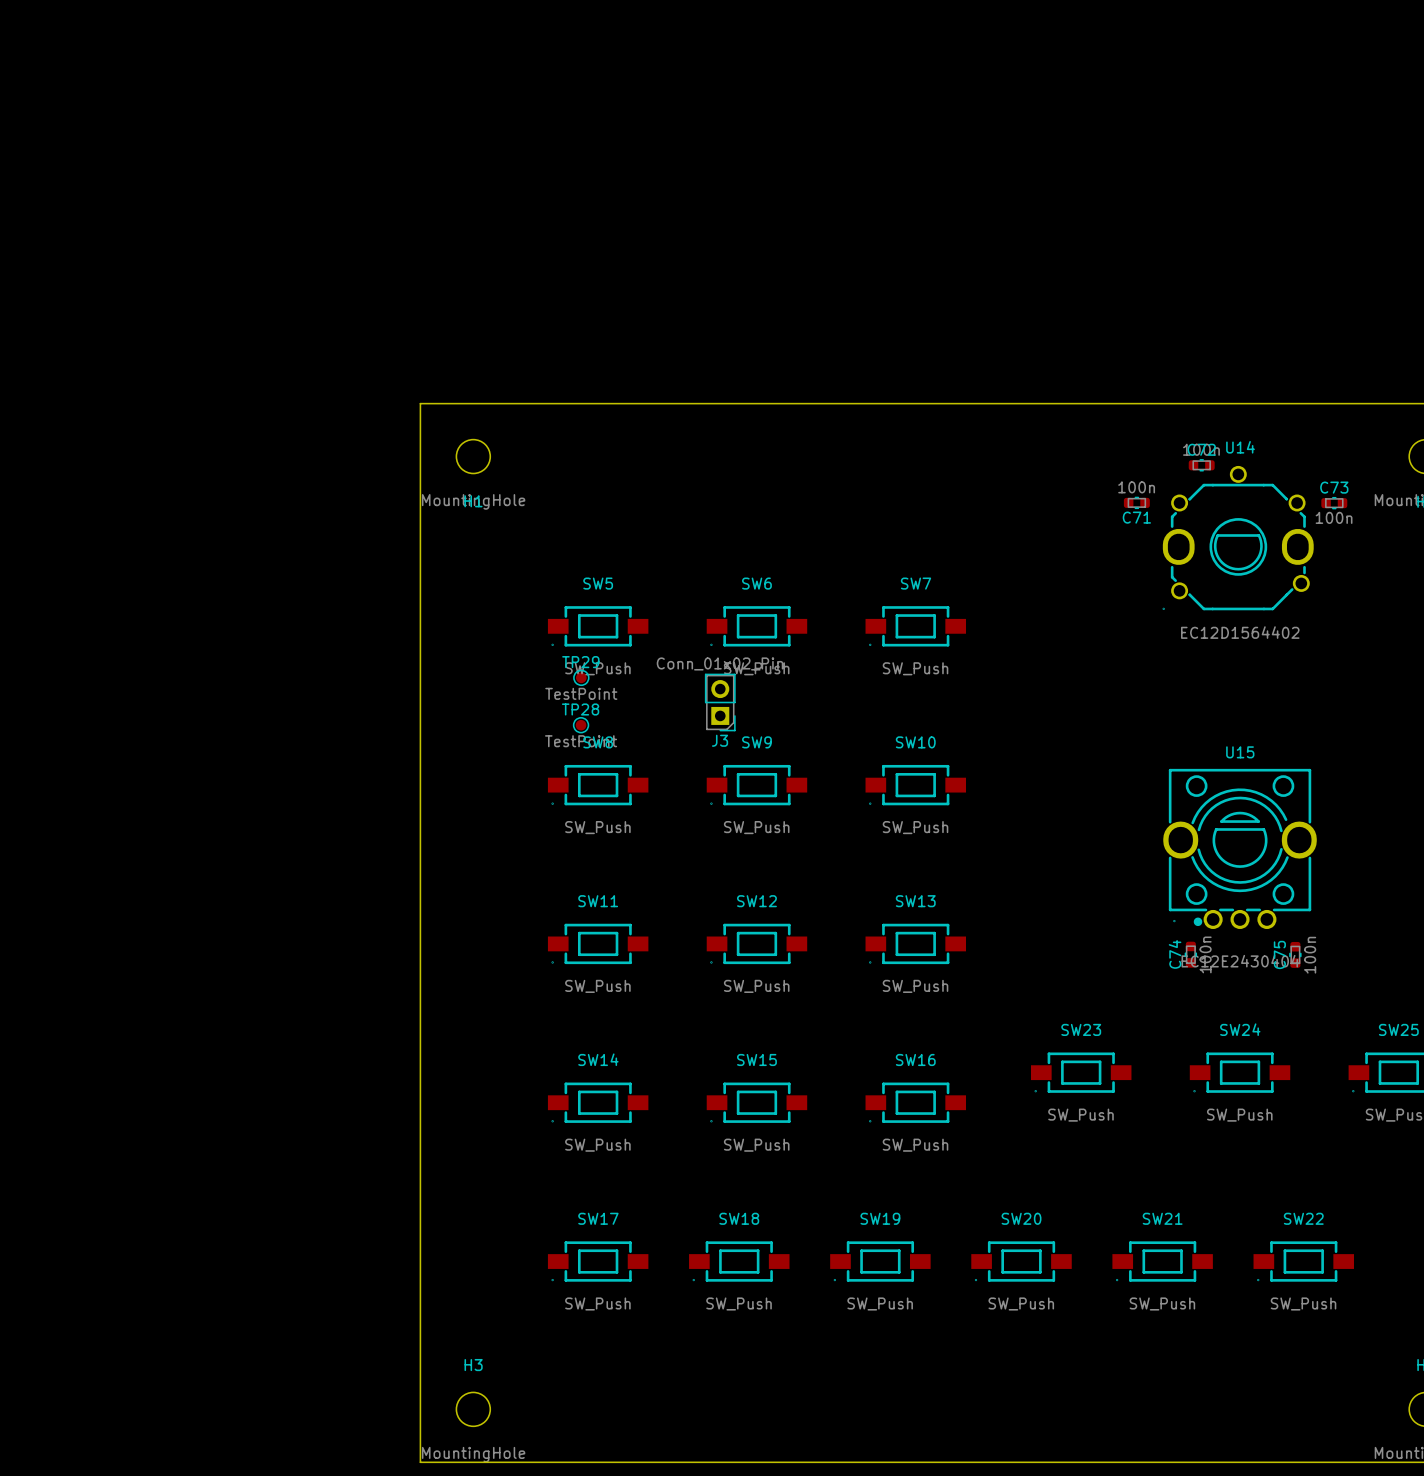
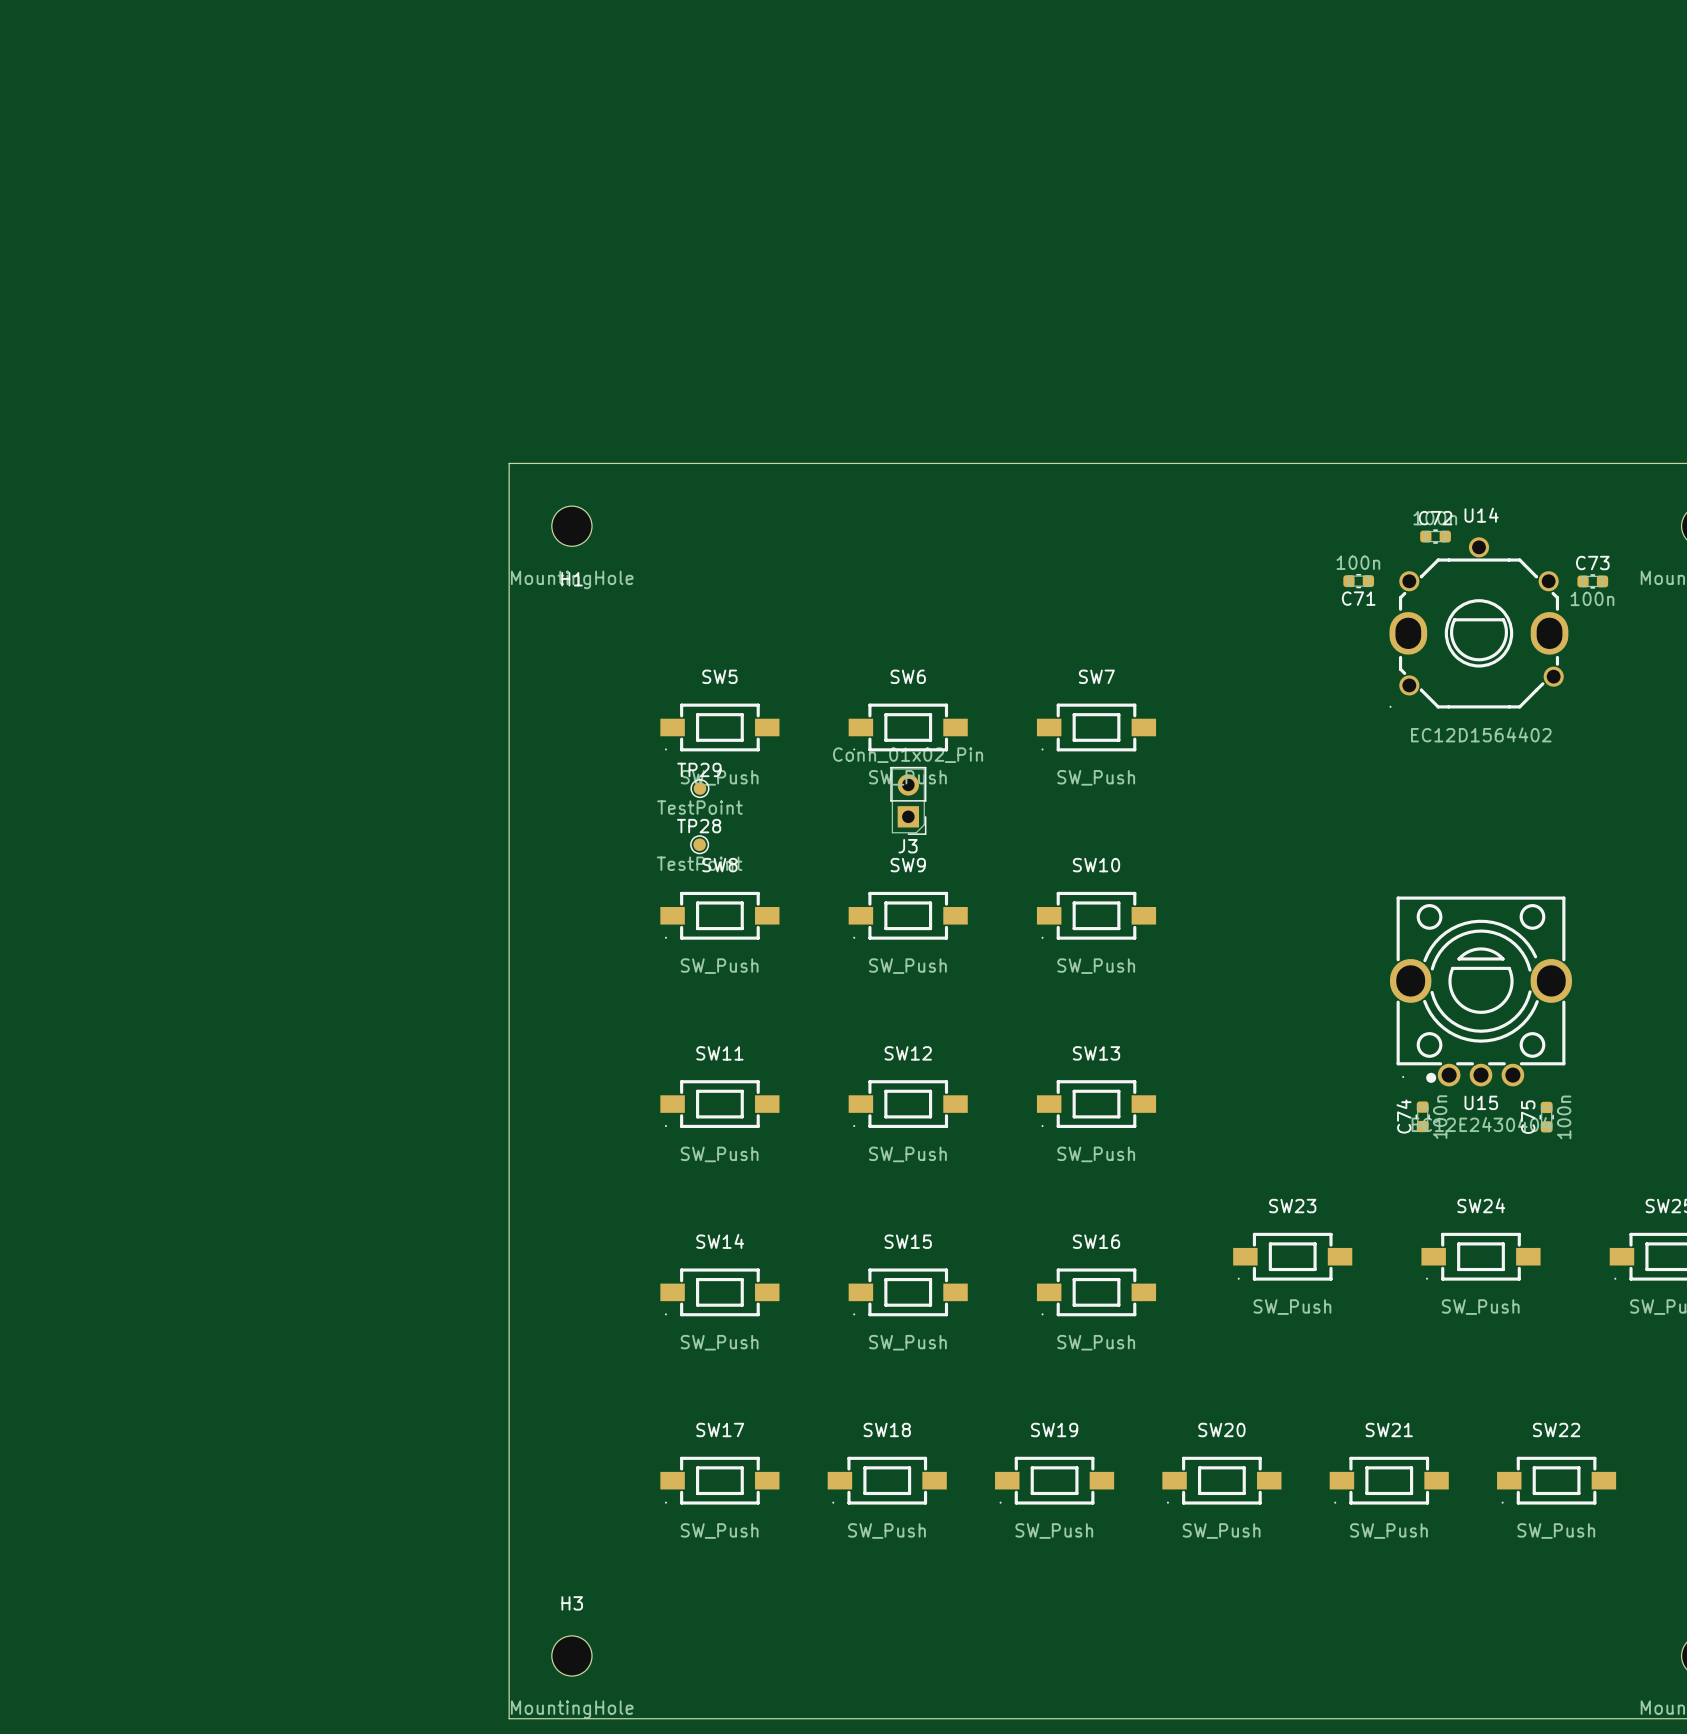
J3 position: (720, 702) -> (908, 800)
U15 name position: U15 (1240, 752) -> U15 (1481, 1102)

